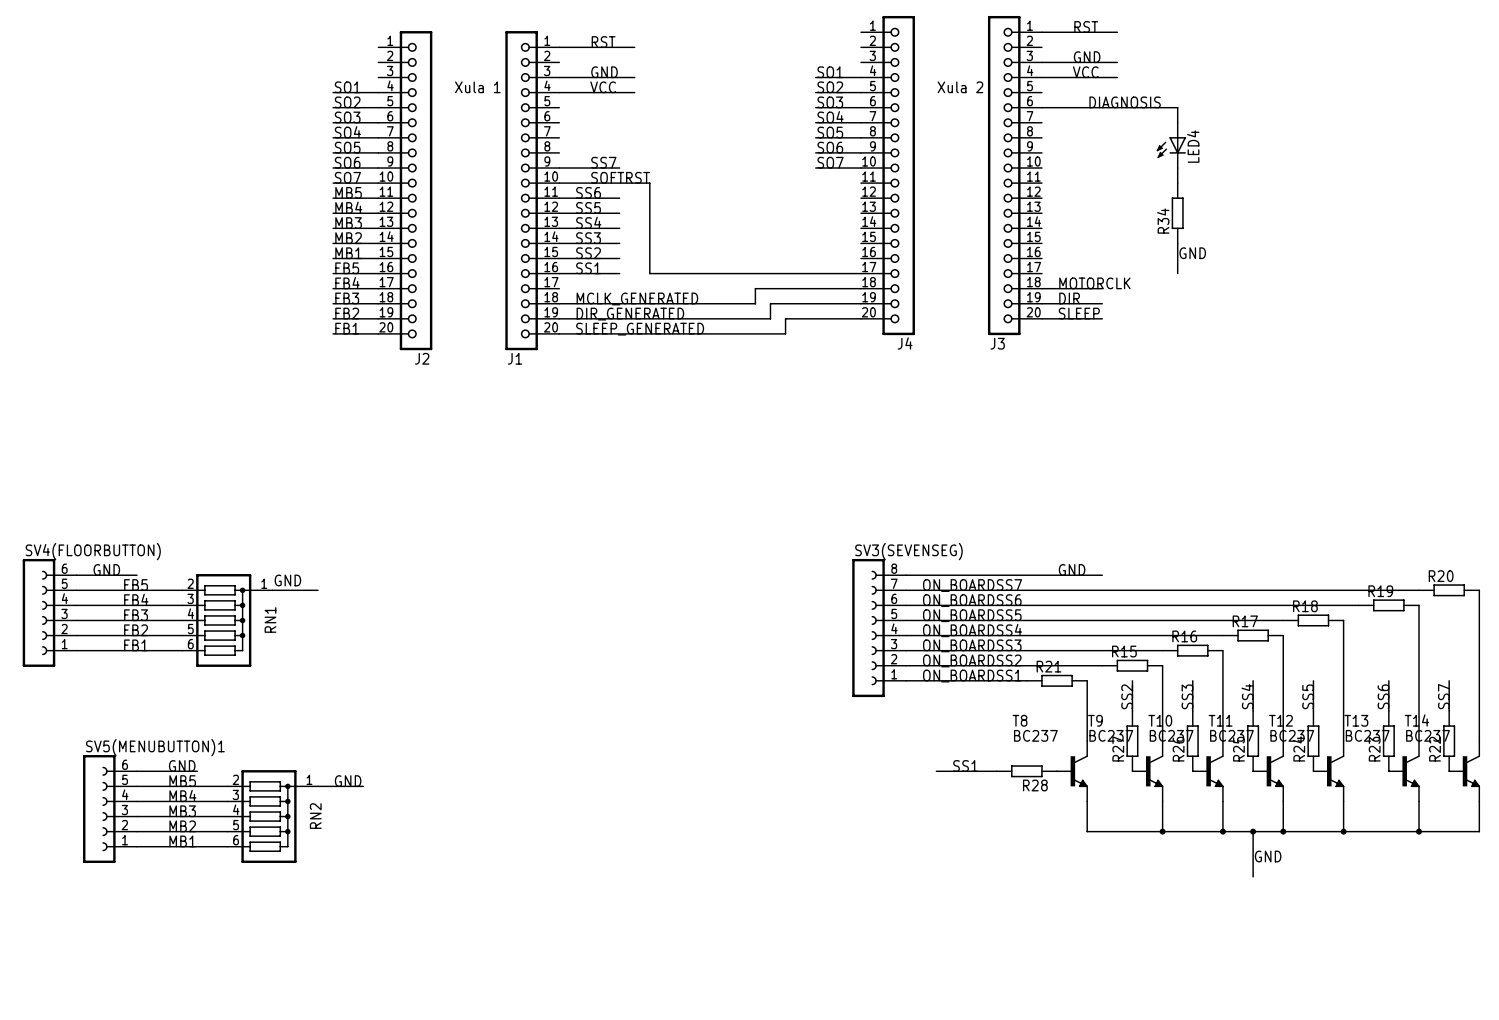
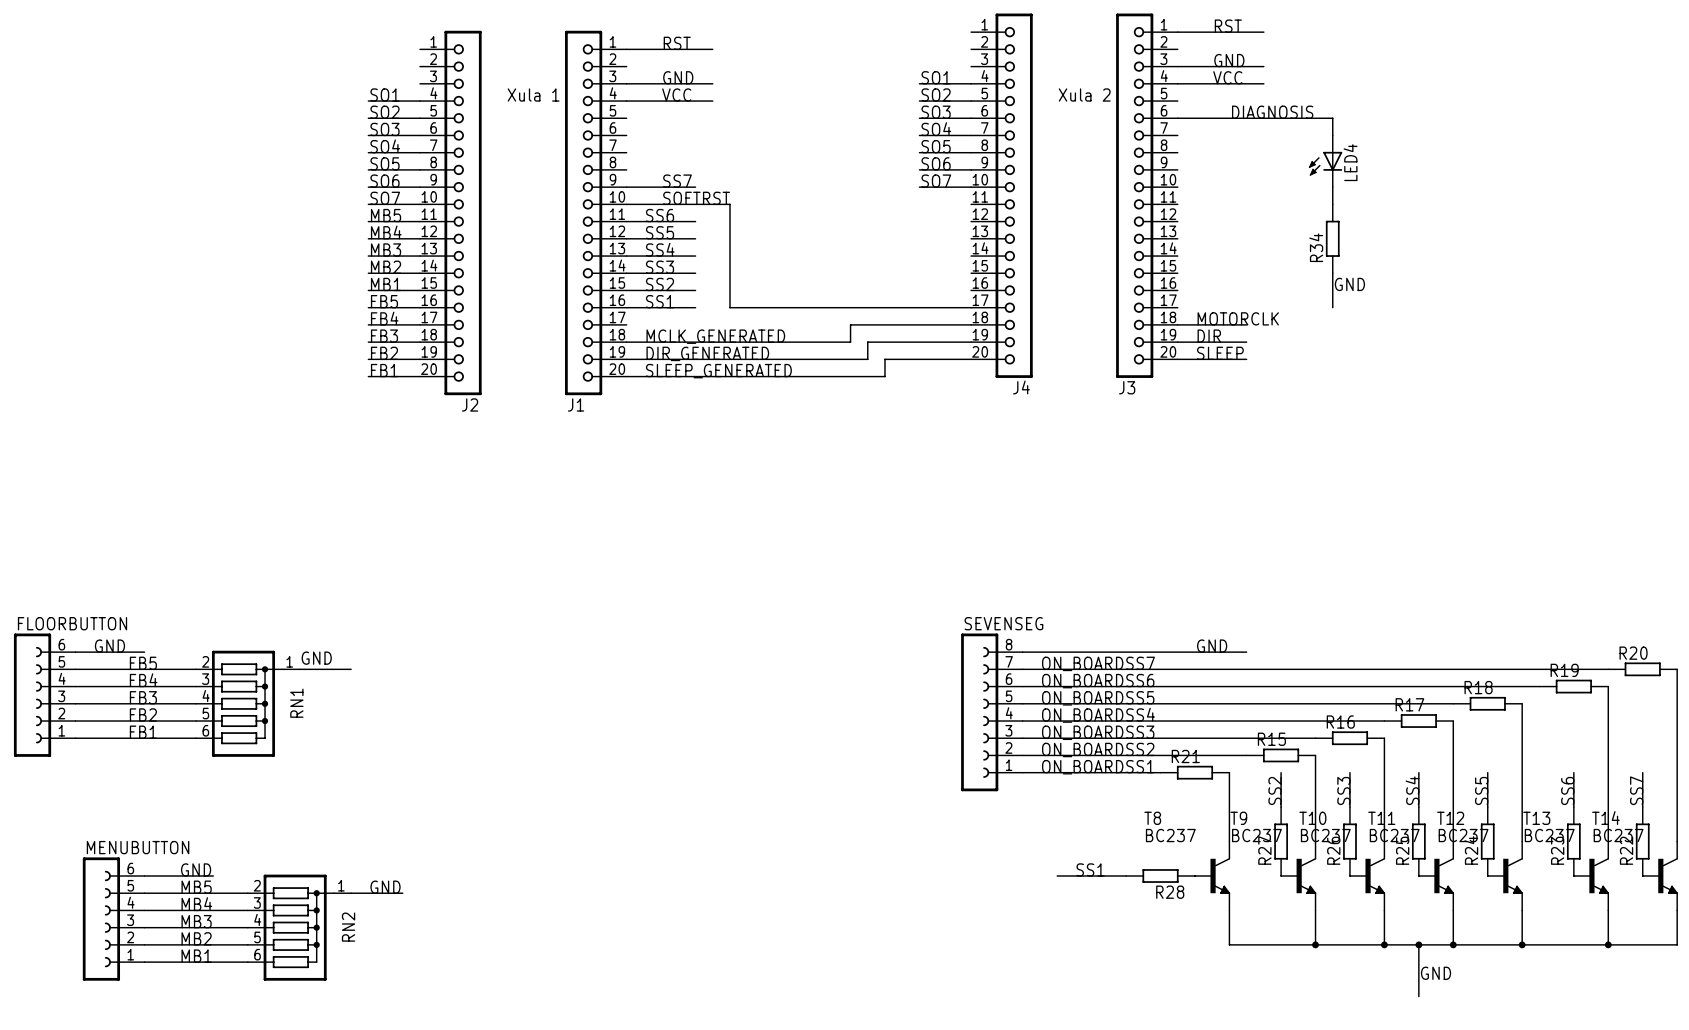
SV4(FLOORBUTTON) name: SV4(FLOORBUTTON) (93, 551) -> FLOORBUTTON (72, 623)
SV3(SEVENSEG) name: SV3(SEVENSEG) (908, 551) -> SEVENSEG (1003, 623)
SV5(MENUBUTTON)1 name: SV5(MENUBUTTON)1 (155, 747) -> MENUBUTTON (138, 847)

